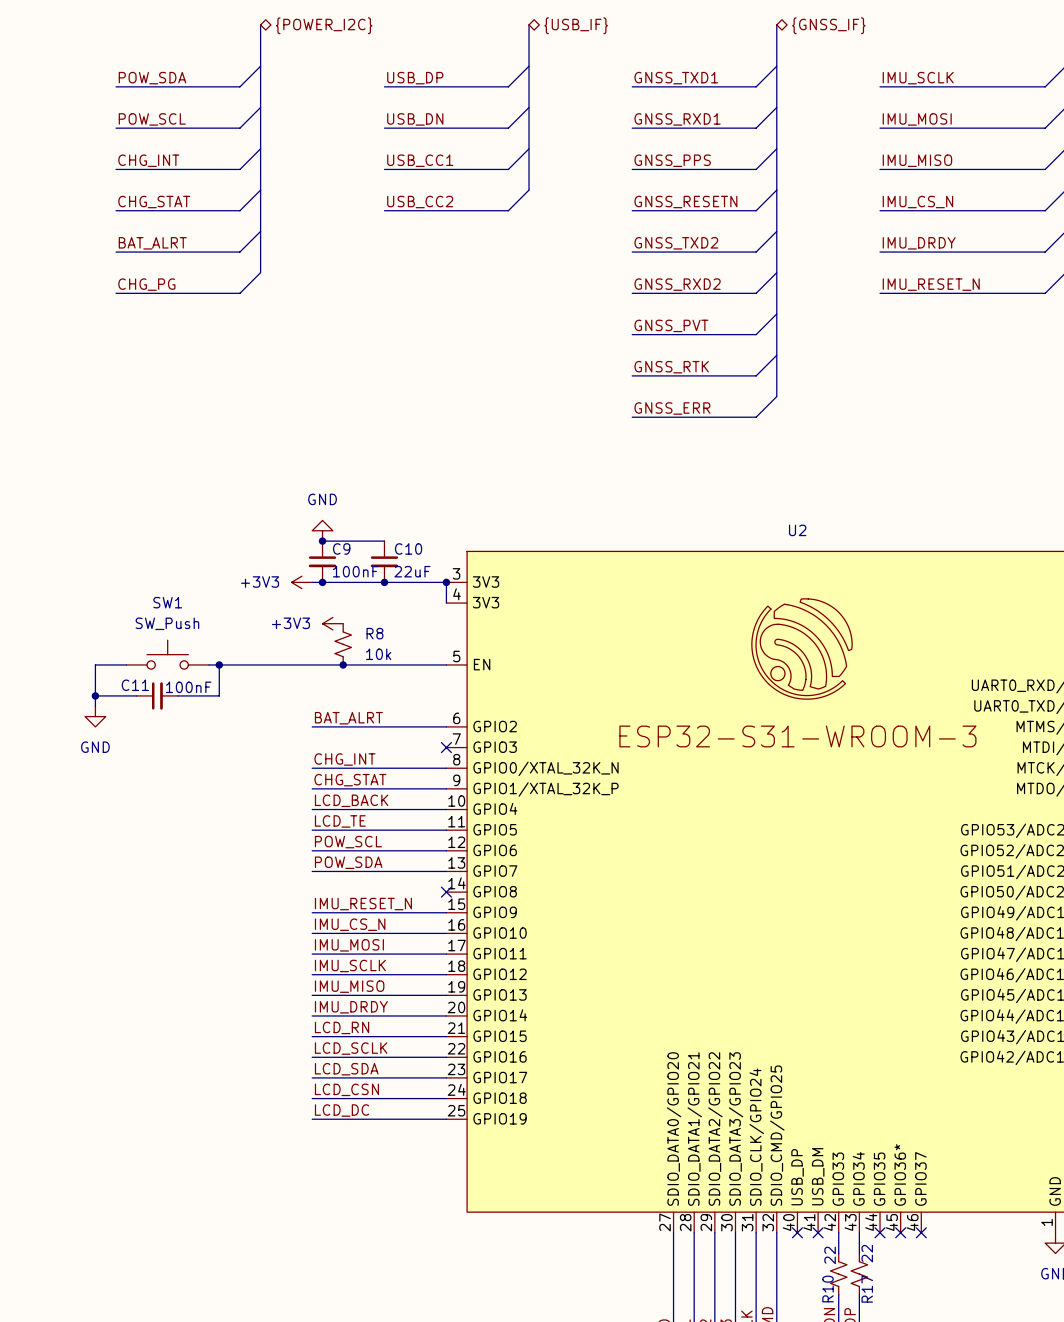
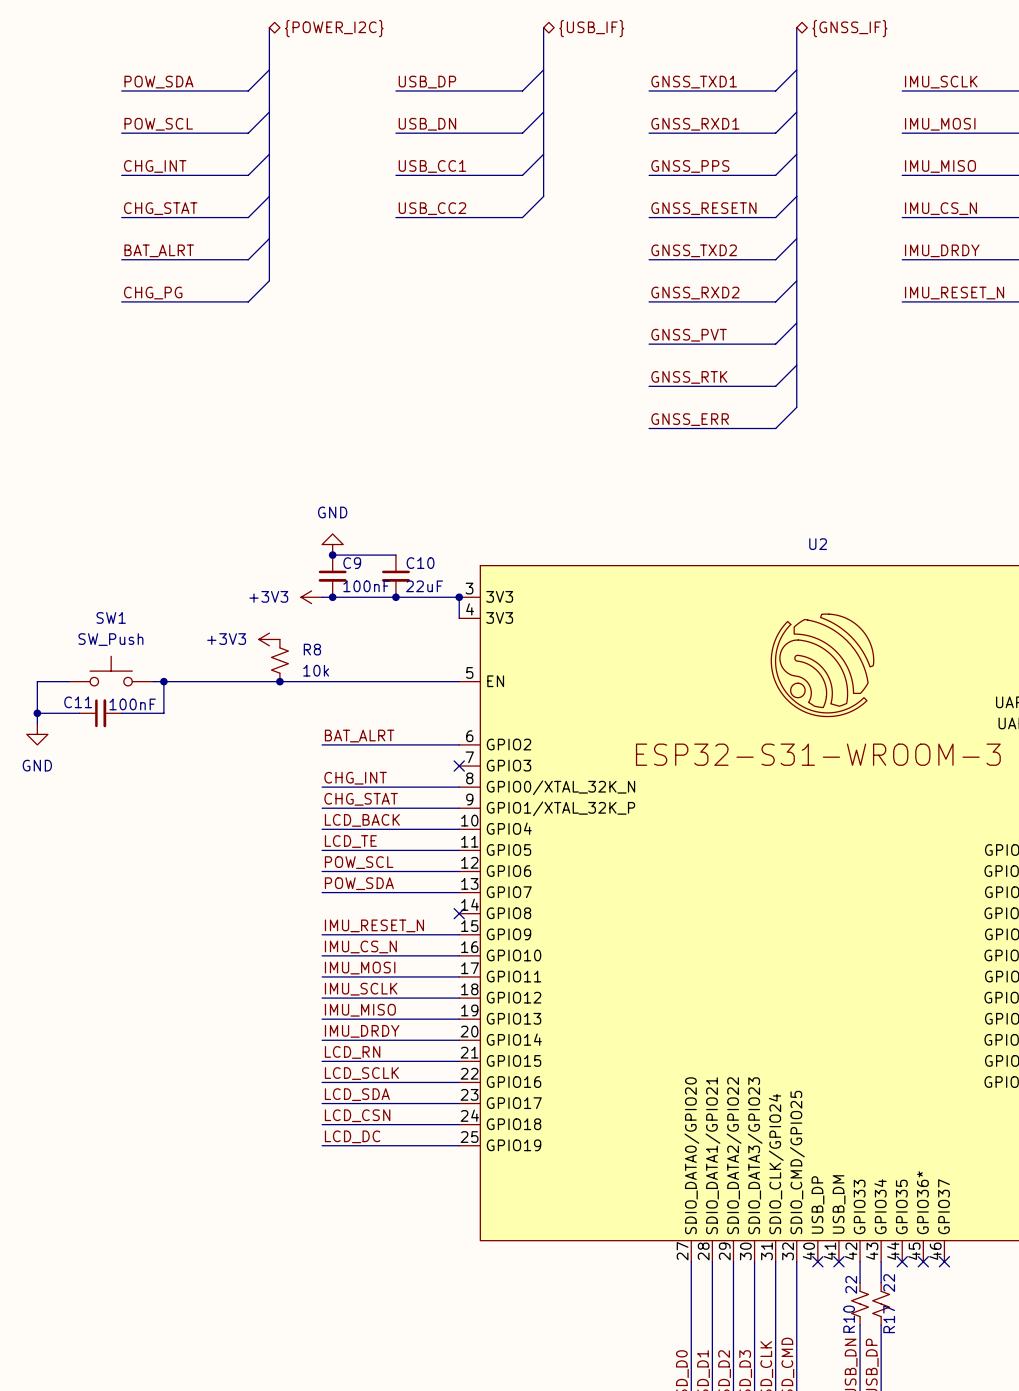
power symbol position: +3V3 (332, 623) -> +3V3 (269, 639)
R8 position: (343, 644) -> (279, 660)
SW1 position: (167, 654) -> (111, 671)
wire: (126, 664) (95, 664) (95, 706) -> (68, 681) (37, 681) (37, 723)
wire: none -> (153, 681) (216, 681)
wire: none -> (163, 681) (163, 713) (142, 713)
junction: none -> (163, 681)
wire: (219, 664) (219, 695) (178, 695) -> none
junction: (219, 664) -> none
junction: none -> (279, 681)
junction: (343, 664) -> none
wire: none -> (37, 713) (79, 713)
junction: none -> (37, 713)
junction: (95, 695) -> none
C11 position: (157, 695) -> (100, 713)
power symbol position: GND (95, 716) -> GND (37, 734)

